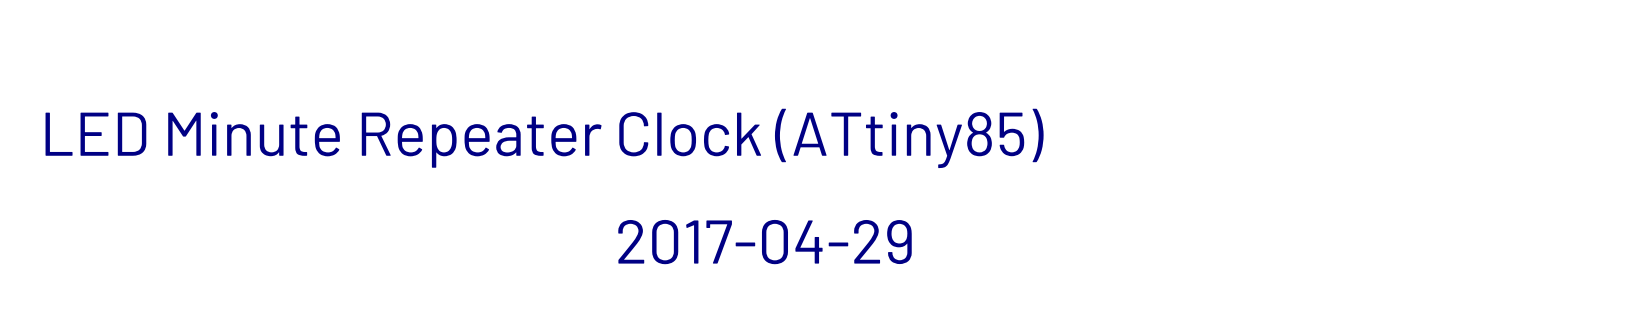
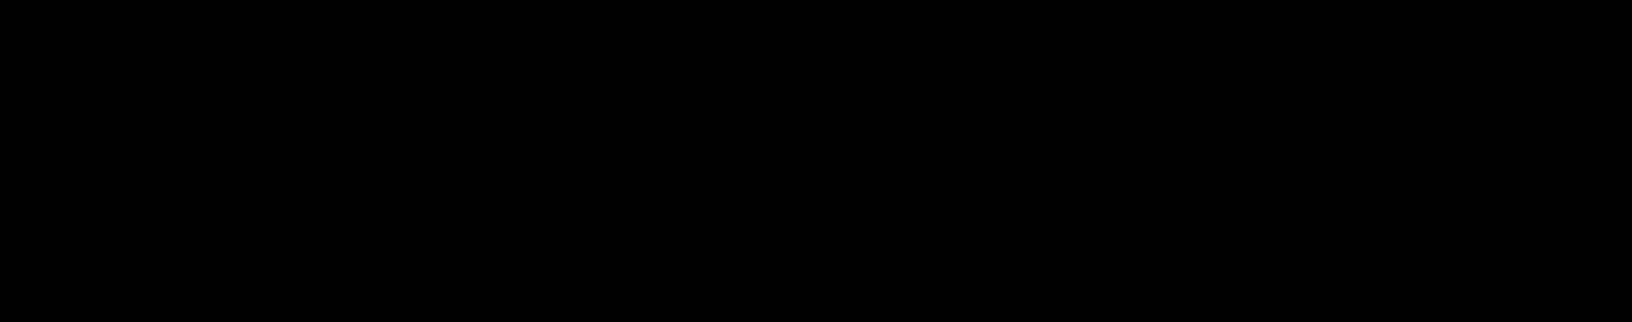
text: LED Minute Repeater Clock (ATtiny85) (544, 138) -> none
text: 2017-04-29 (765, 242) -> none

